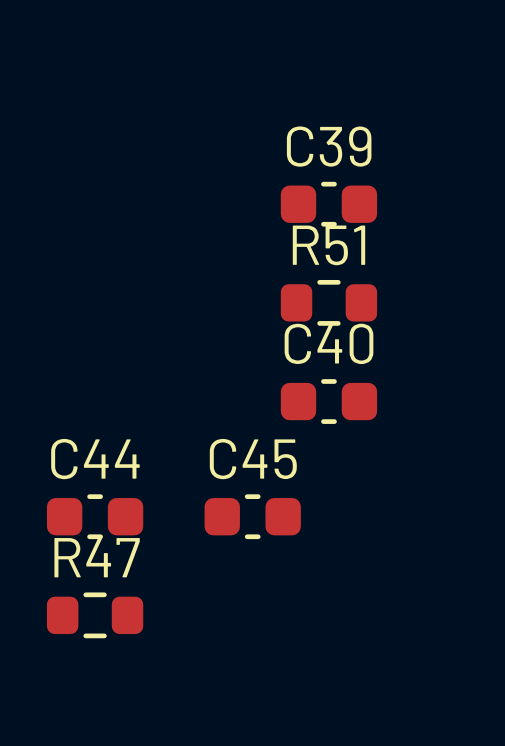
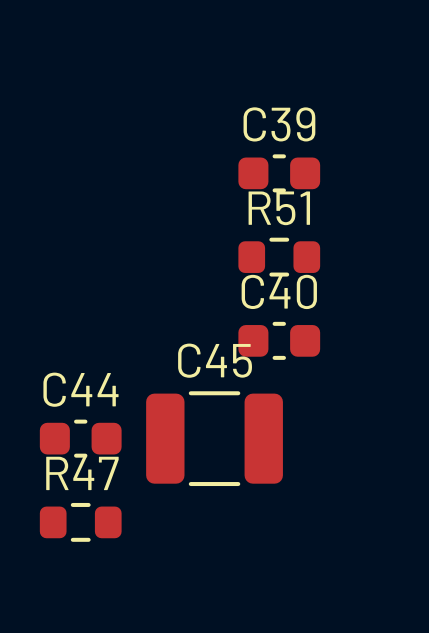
C45 footprint: [204, 494, 301, 540] -> [146, 391, 283, 487]

